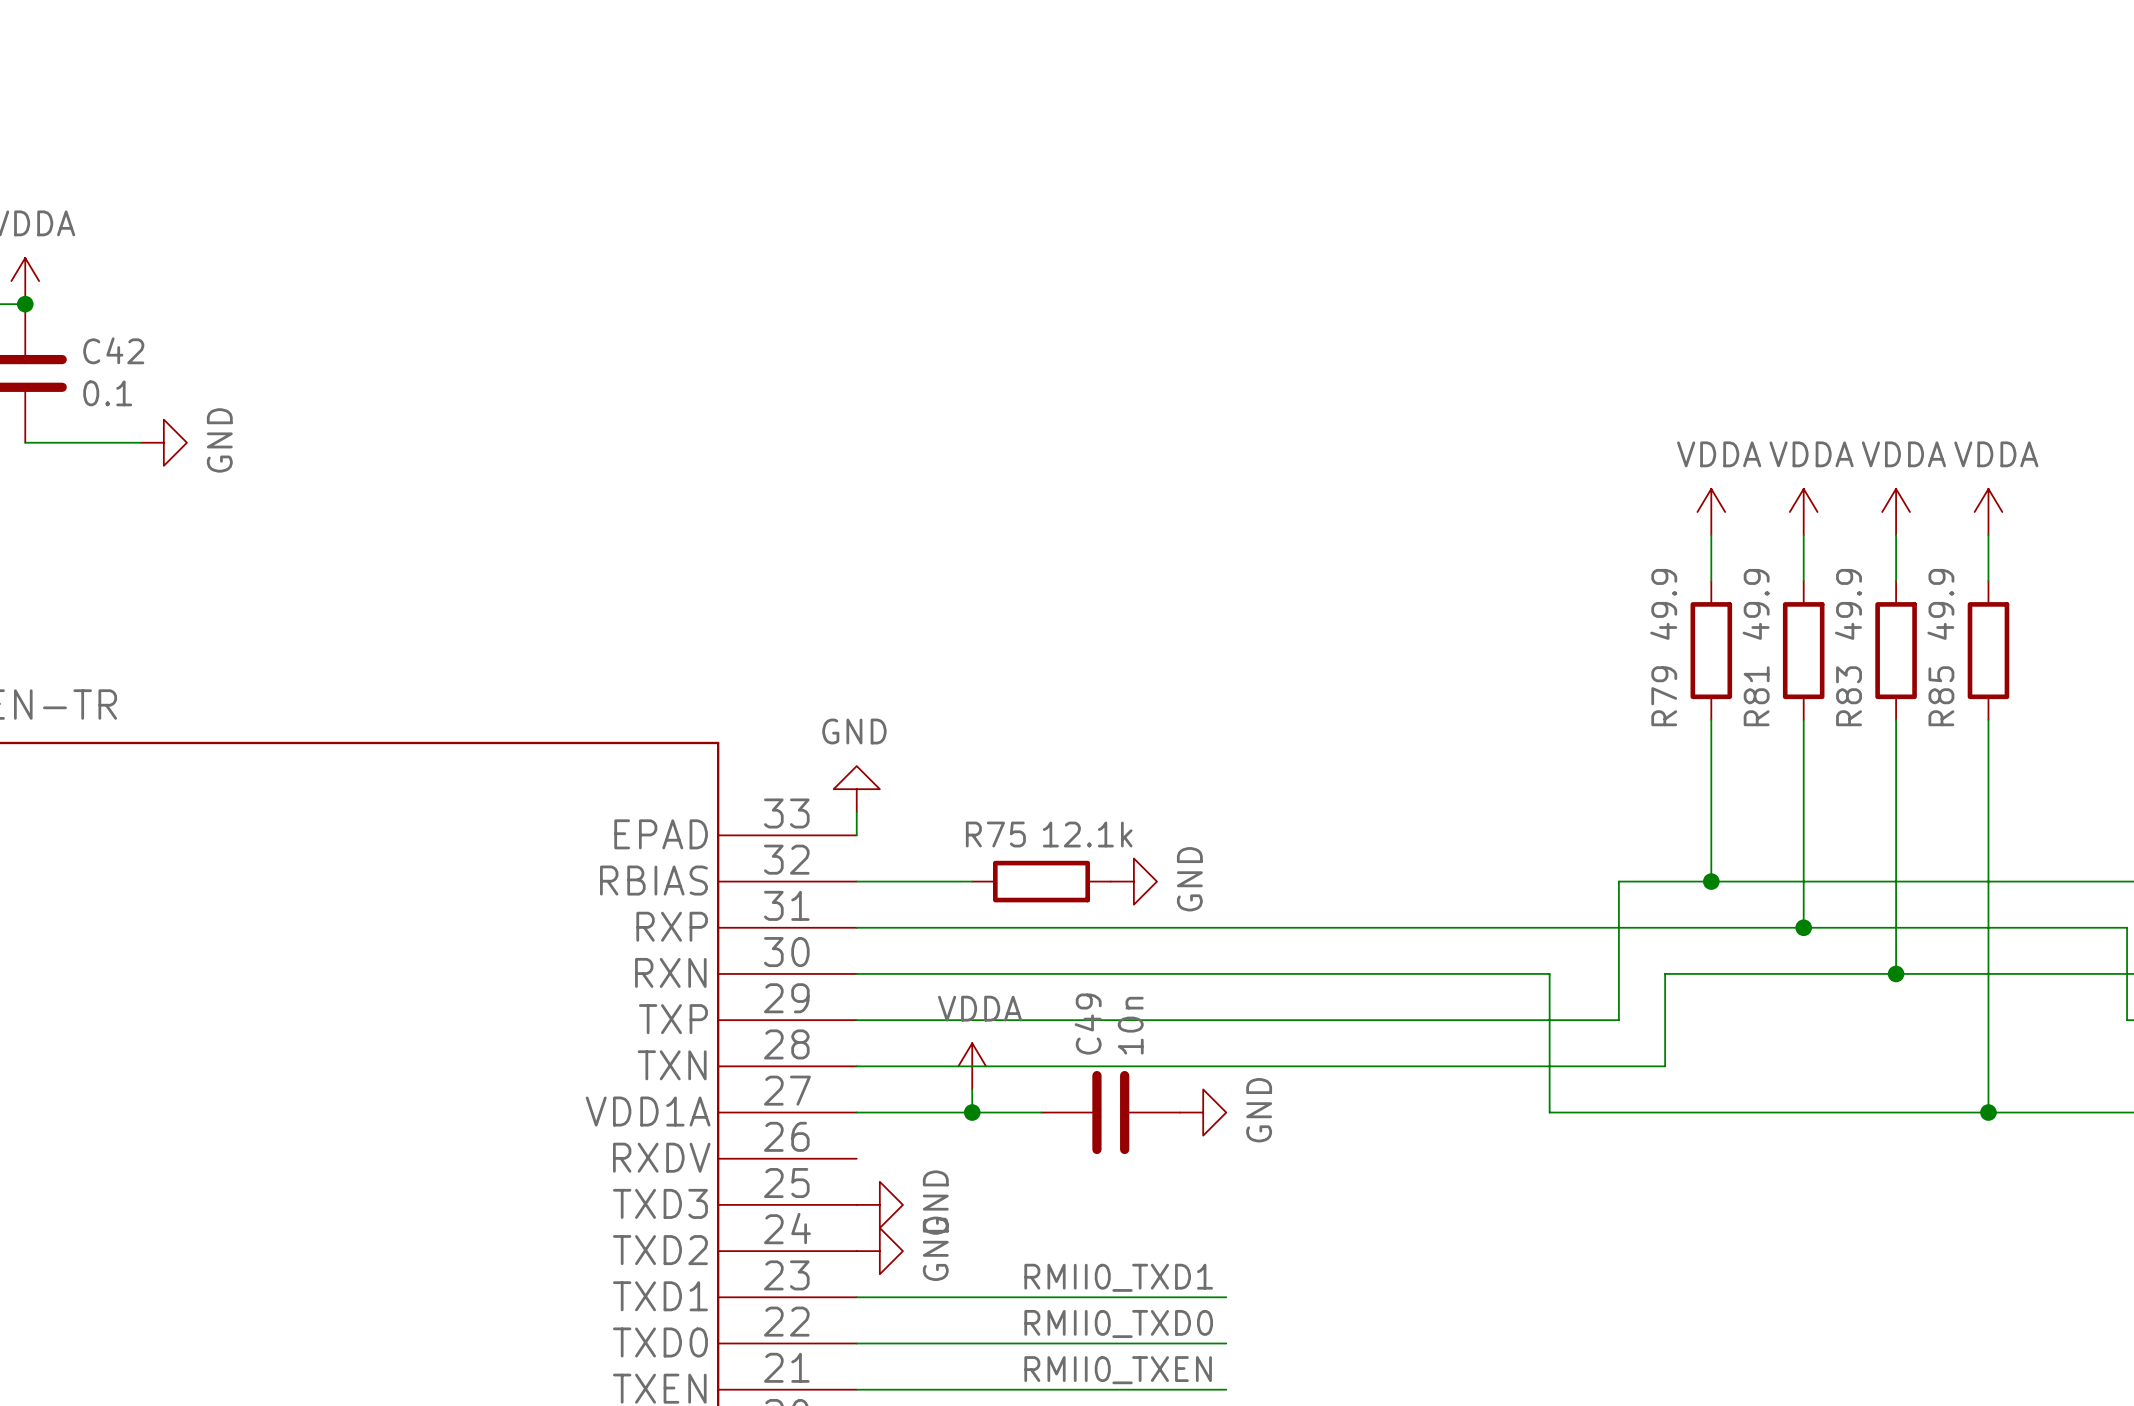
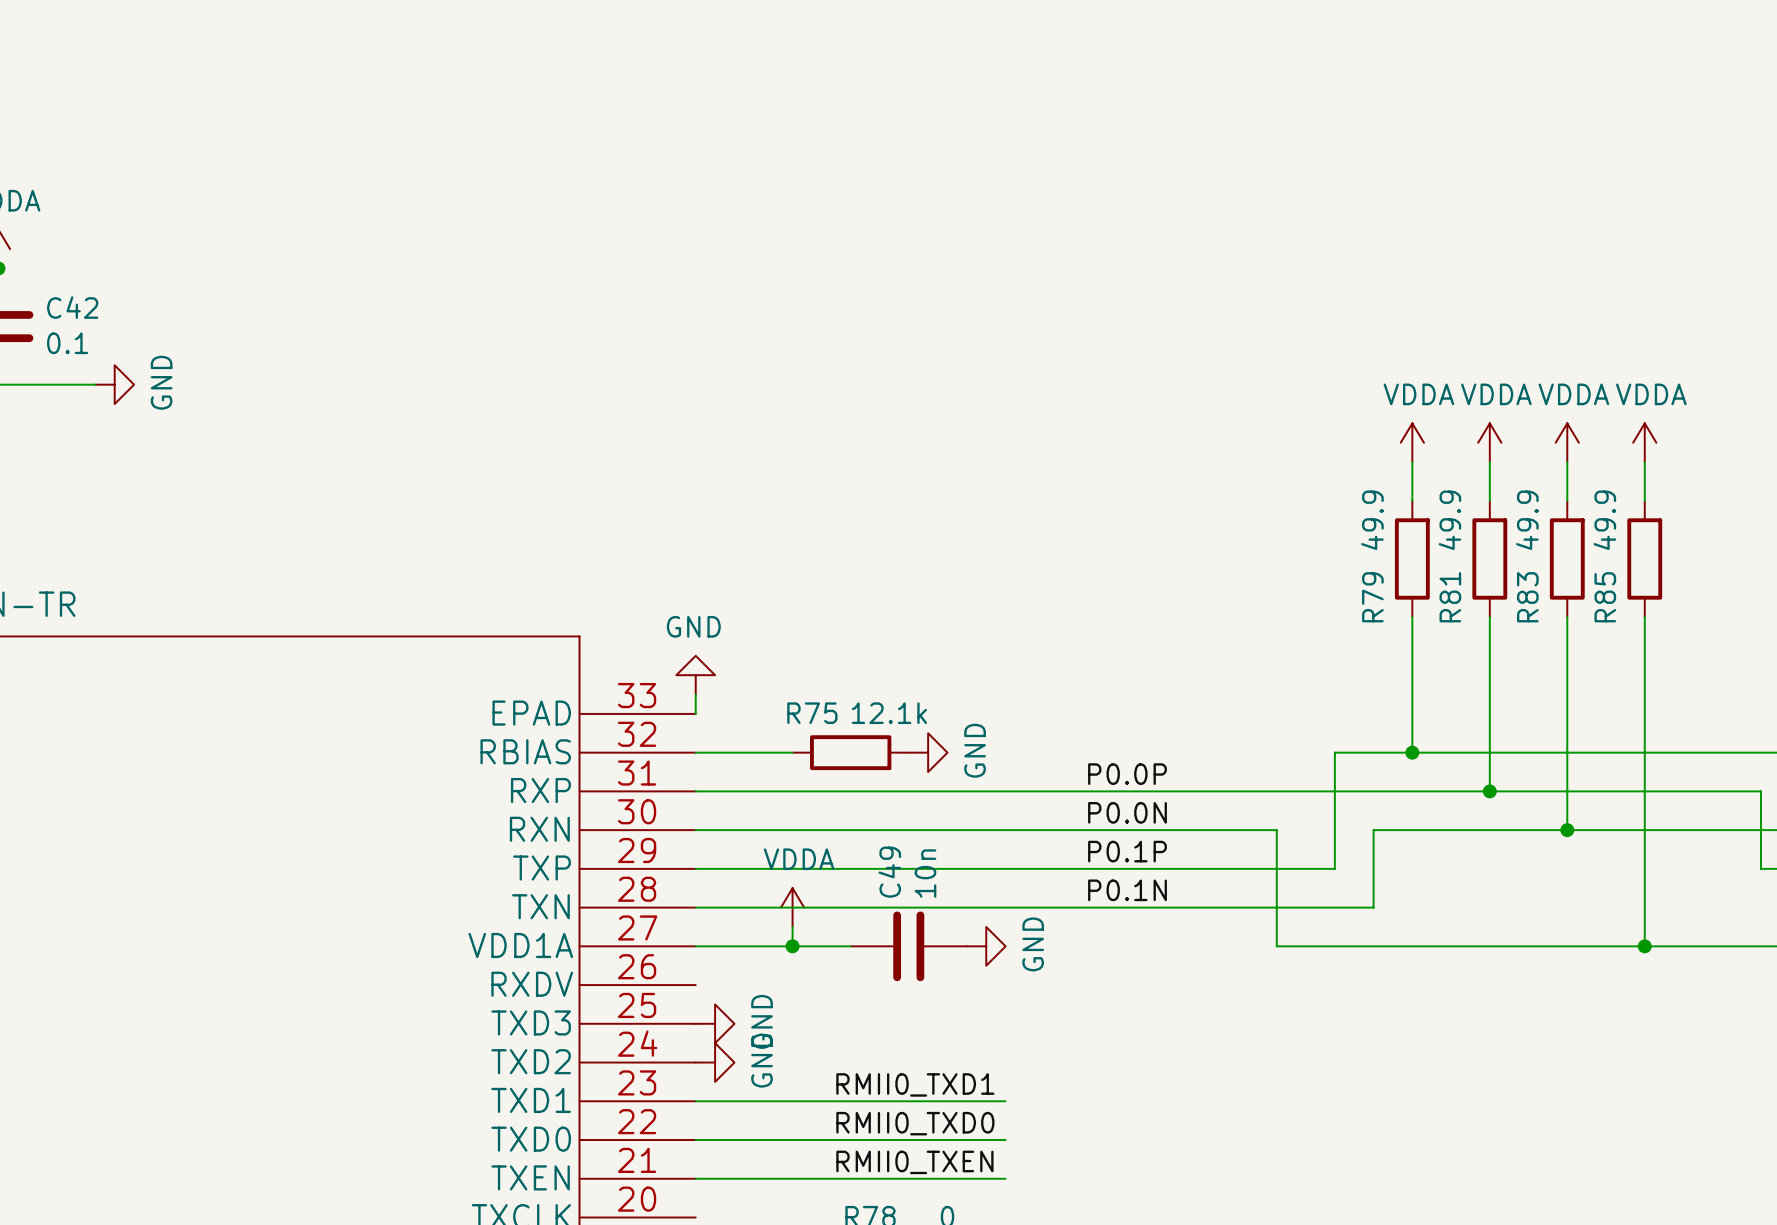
label: none -> P0.0P (1127, 774)
label: none -> P0.0N (1127, 812)
label: none -> P0.1P (1127, 851)
label: none -> P0.1N (1127, 890)

